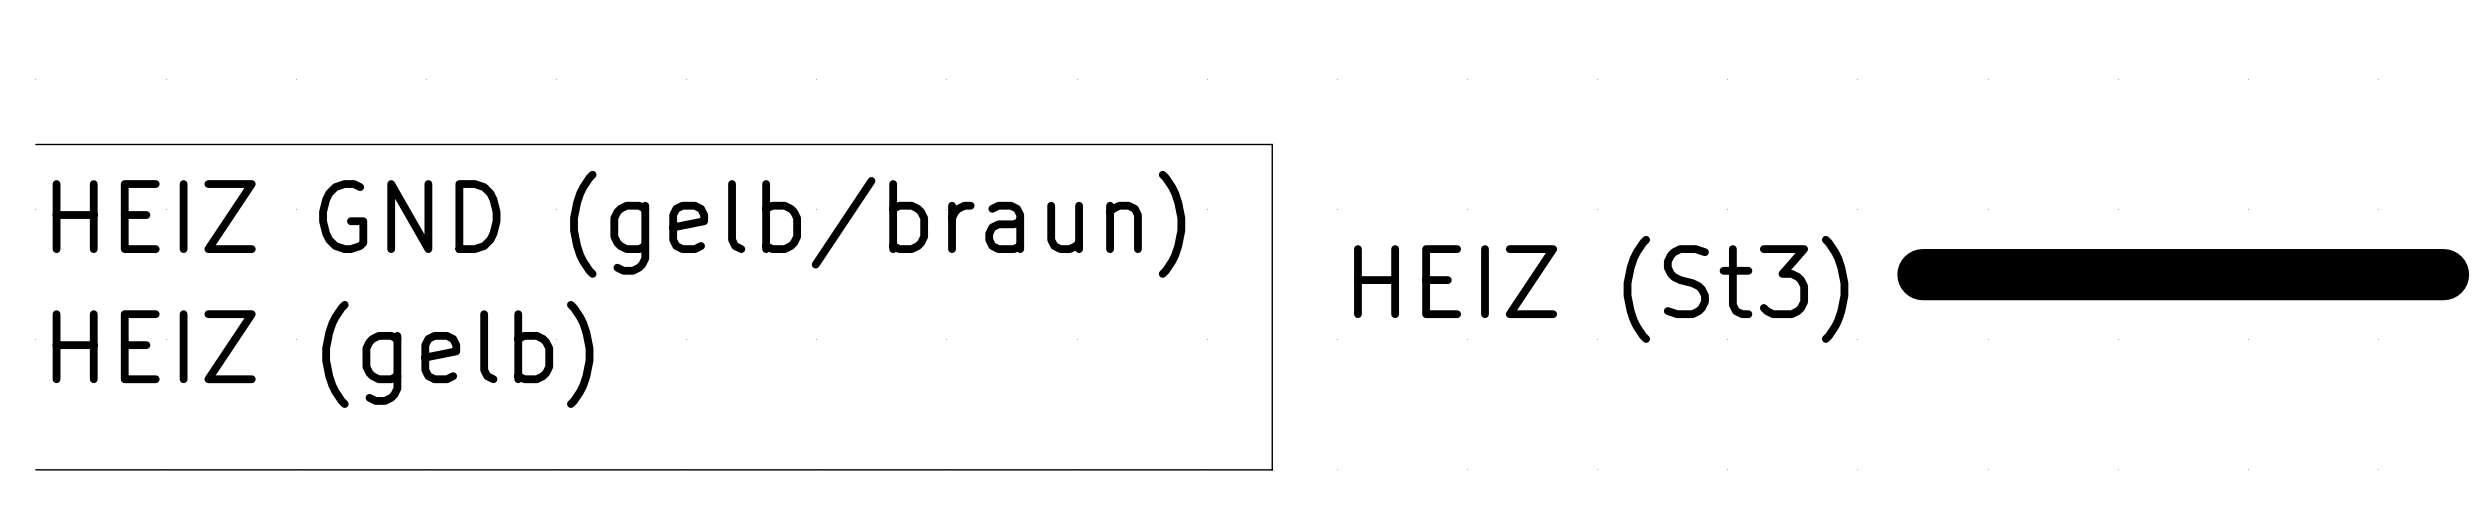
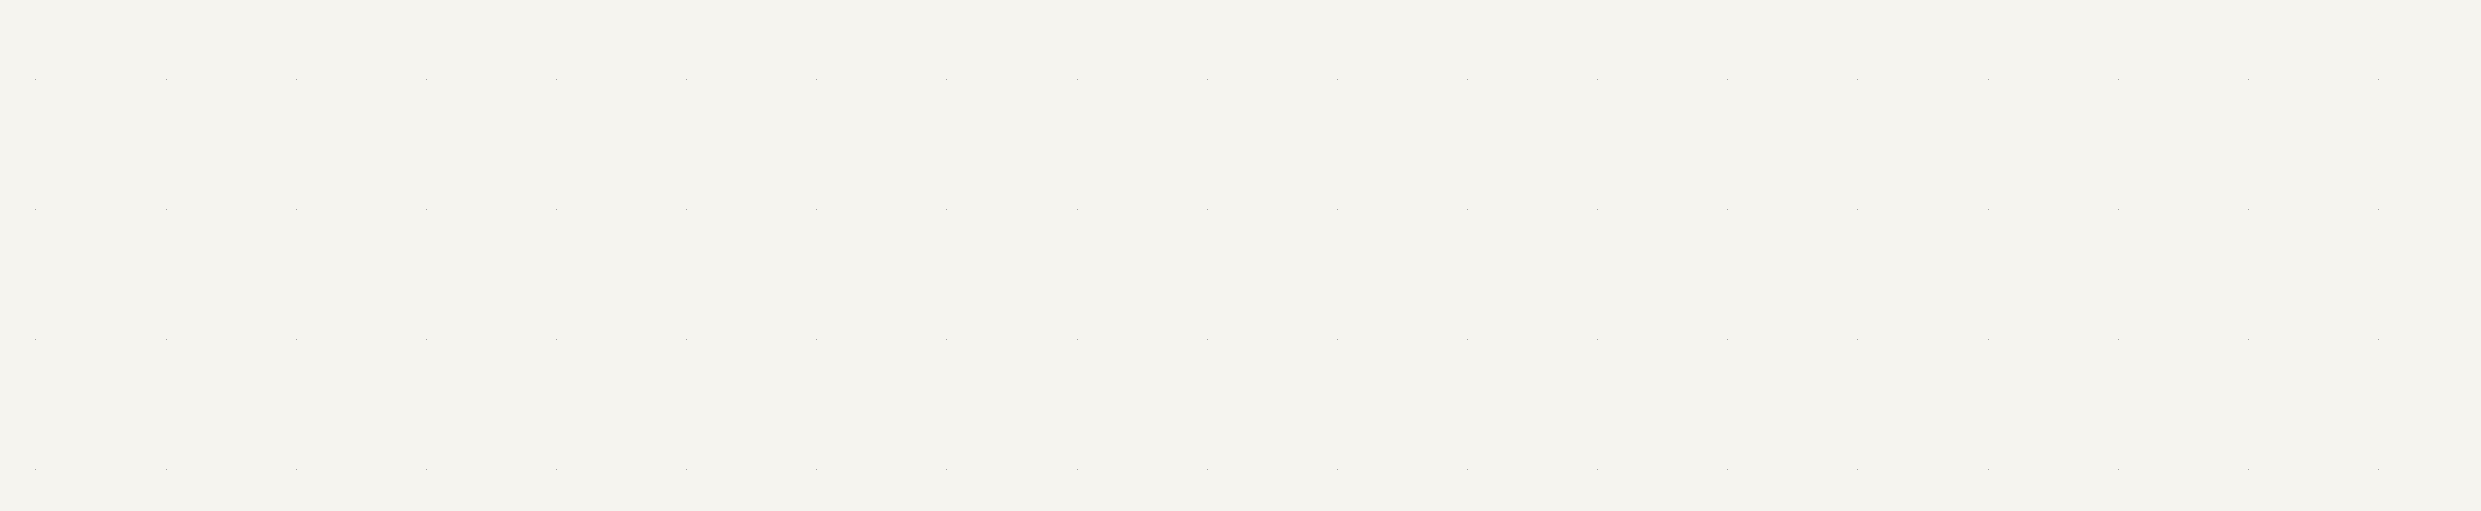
line: (35, 144) (1272, 144) (1272, 469) (35, 469) -> none
label: HEIZ GND (gelb/braun) (618, 224) -> none
line: (1922, 274) (2443, 274) -> none
label: HEIZ (St3) (1601, 289) -> none
label: HEIZ (gelb) (323, 354) -> none

